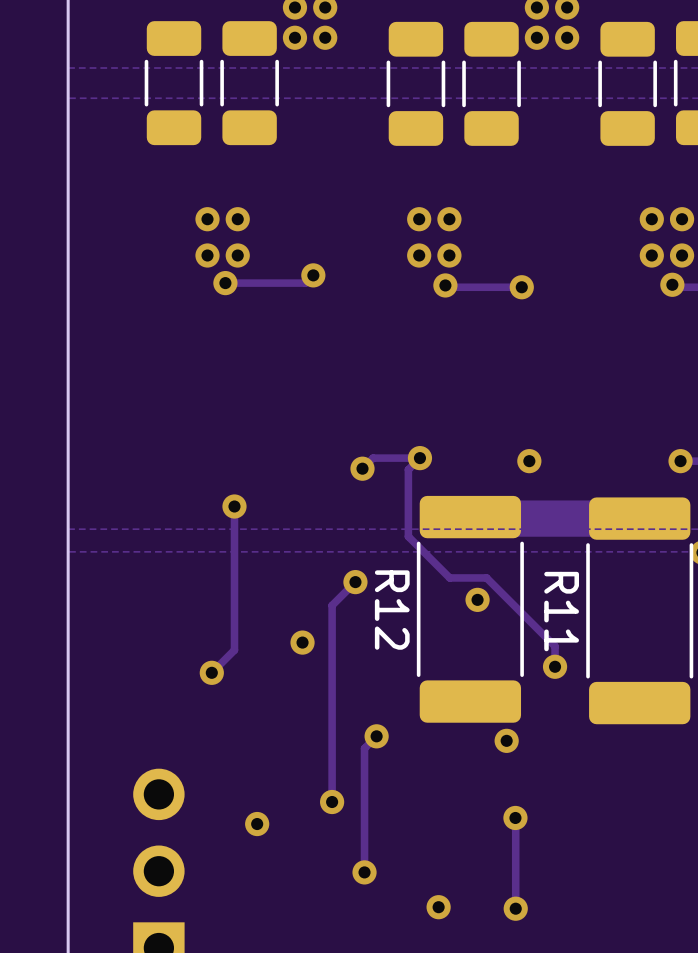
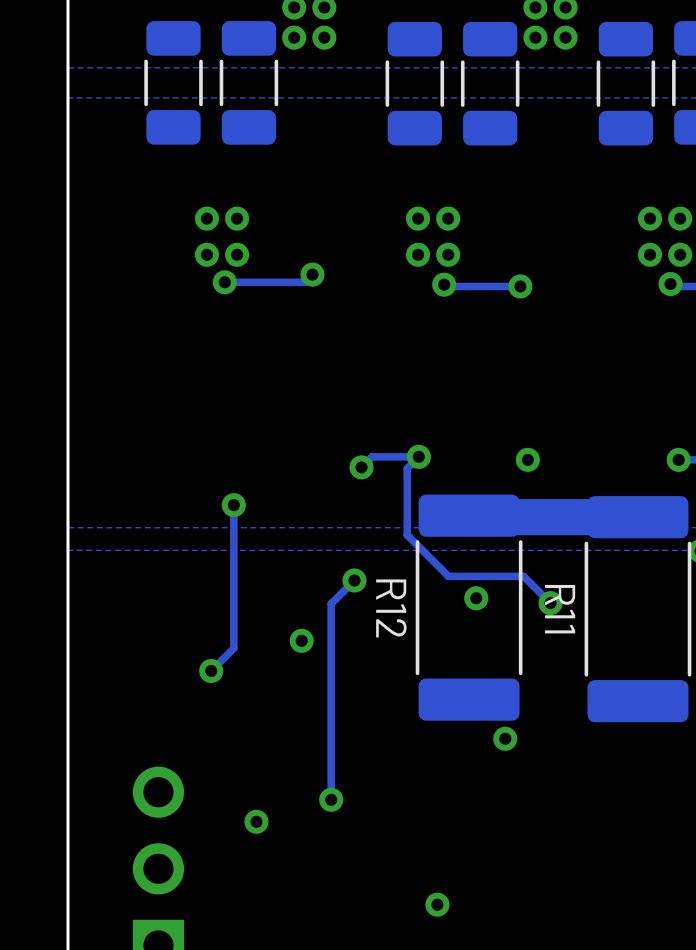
track: (486, 577) (555, 646) (555, 666) -> (485, 576) (523, 576) (550, 603)
via position: (555, 666) -> (550, 603)
track: (376, 736) (364, 748) (364, 872) -> none
via: (376, 736) -> none
via: (515, 817) -> none
track: (515, 818) (515, 908) -> none
via: (364, 872) -> none
via: (515, 908) -> none

